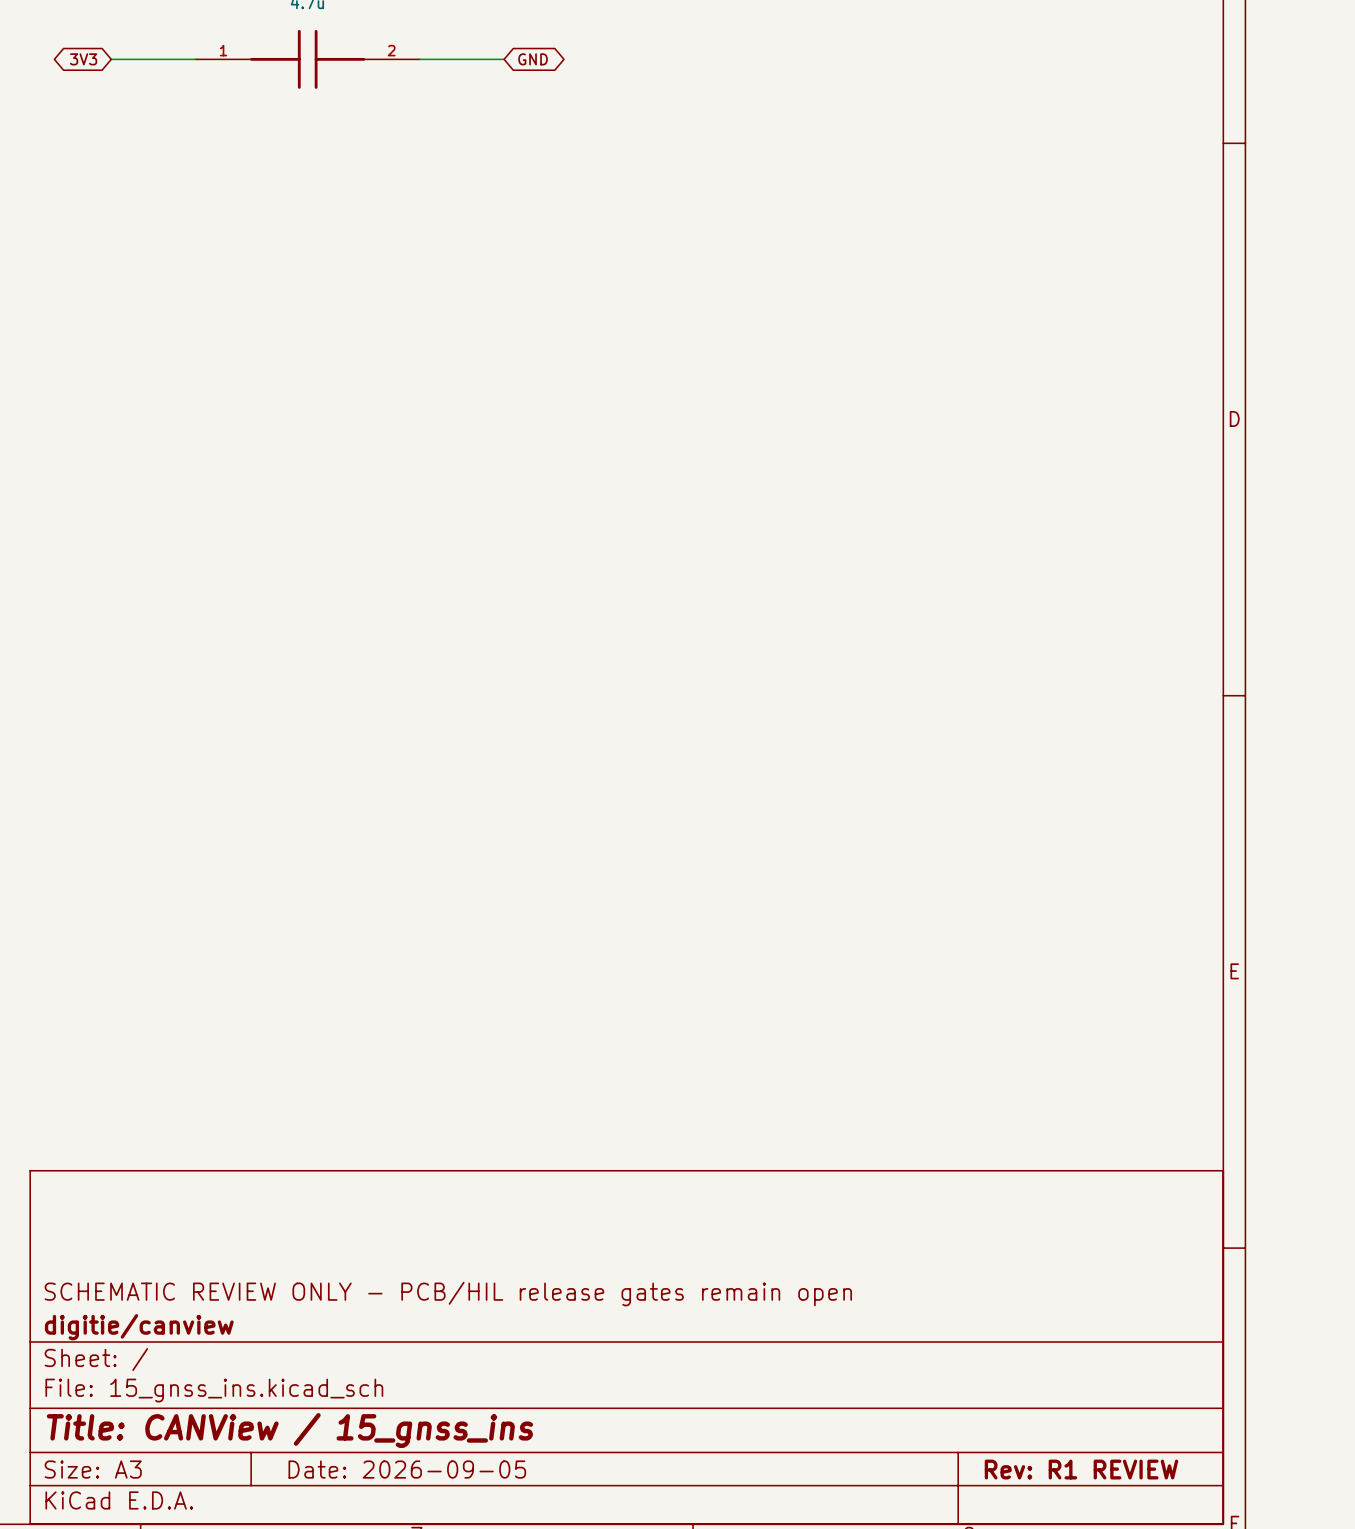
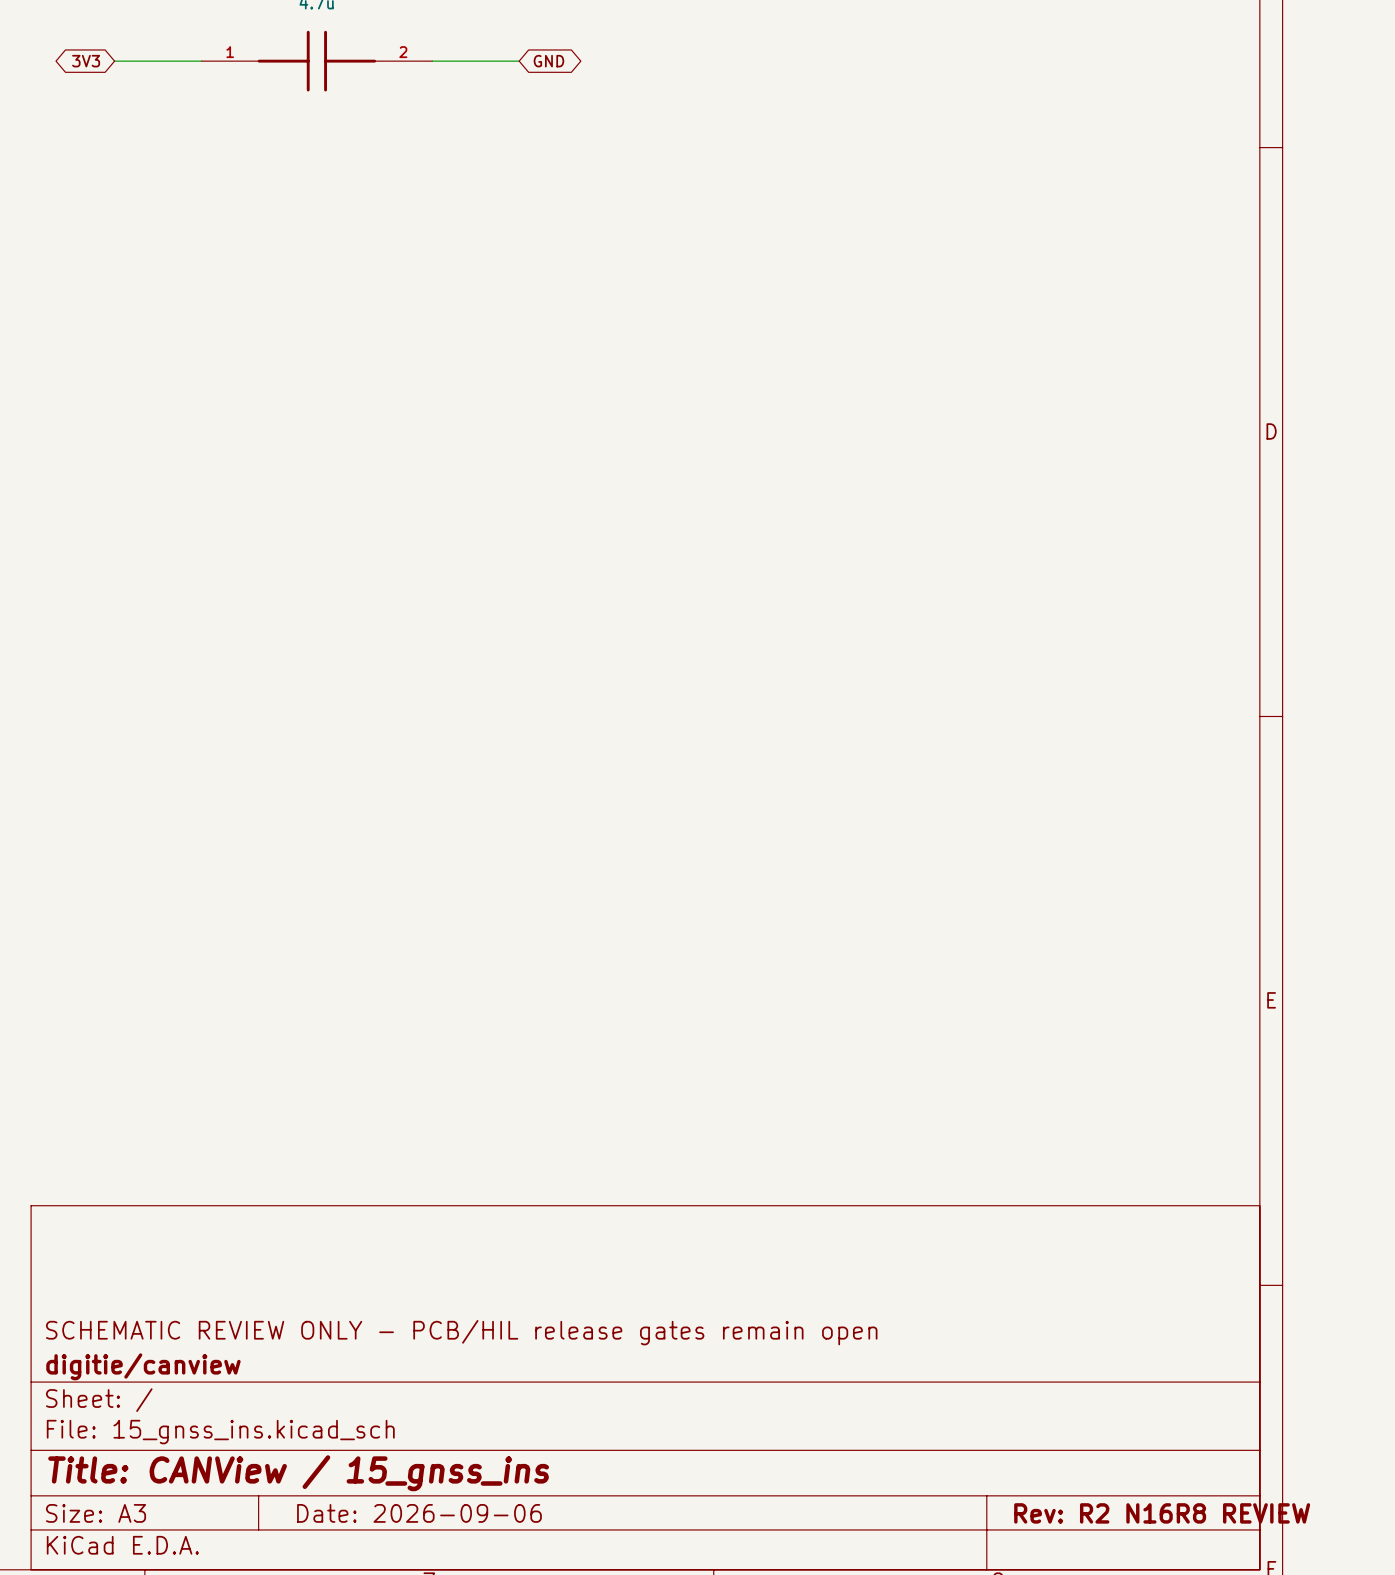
title block: Date: 2026-09-05 (407, 1469) -> Date: 2026-09-06 (419, 1513)
title block: Rev: R1 REVIEW (1081, 1469) -> Rev: R2 N16R8 REVIEW (1162, 1513)

